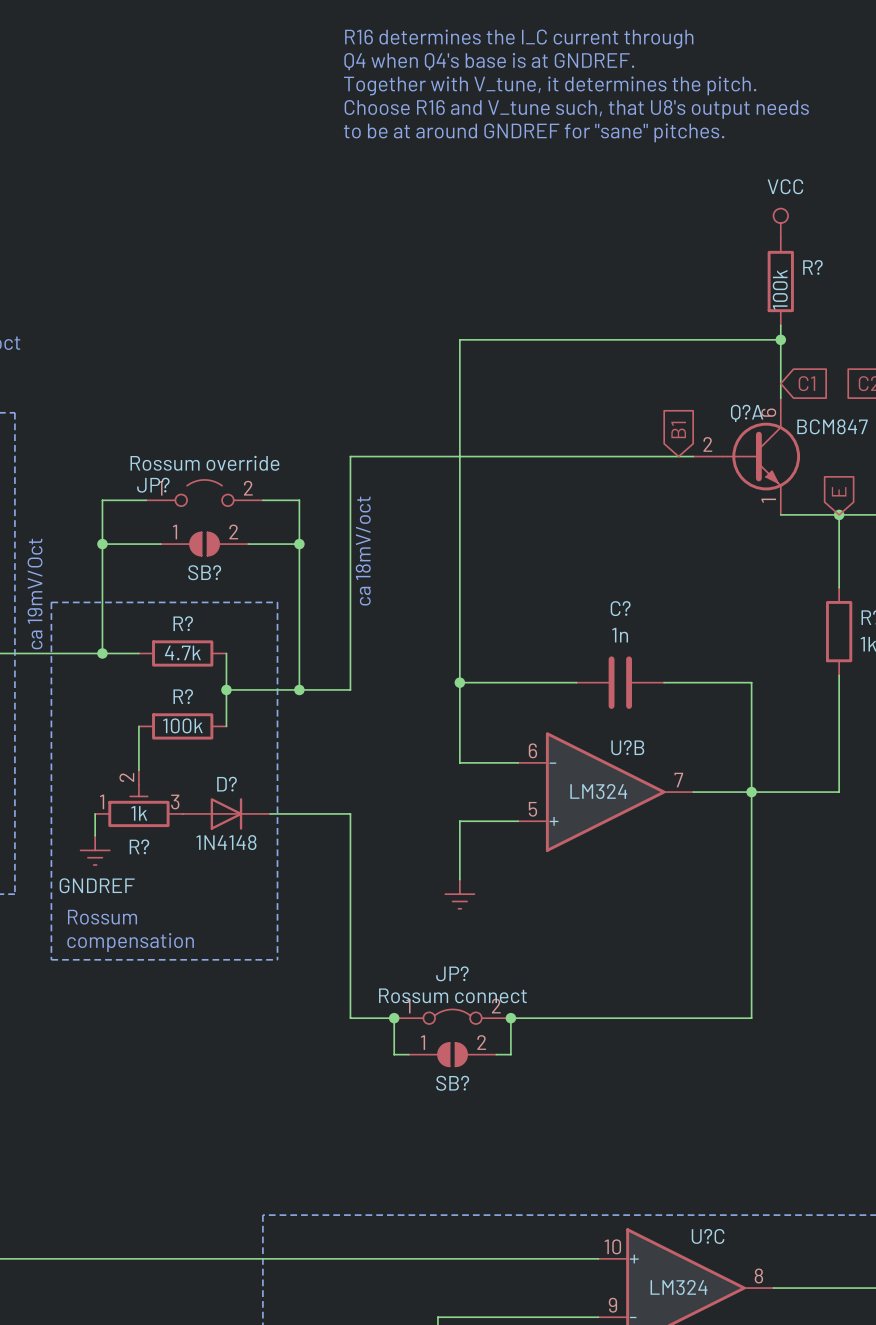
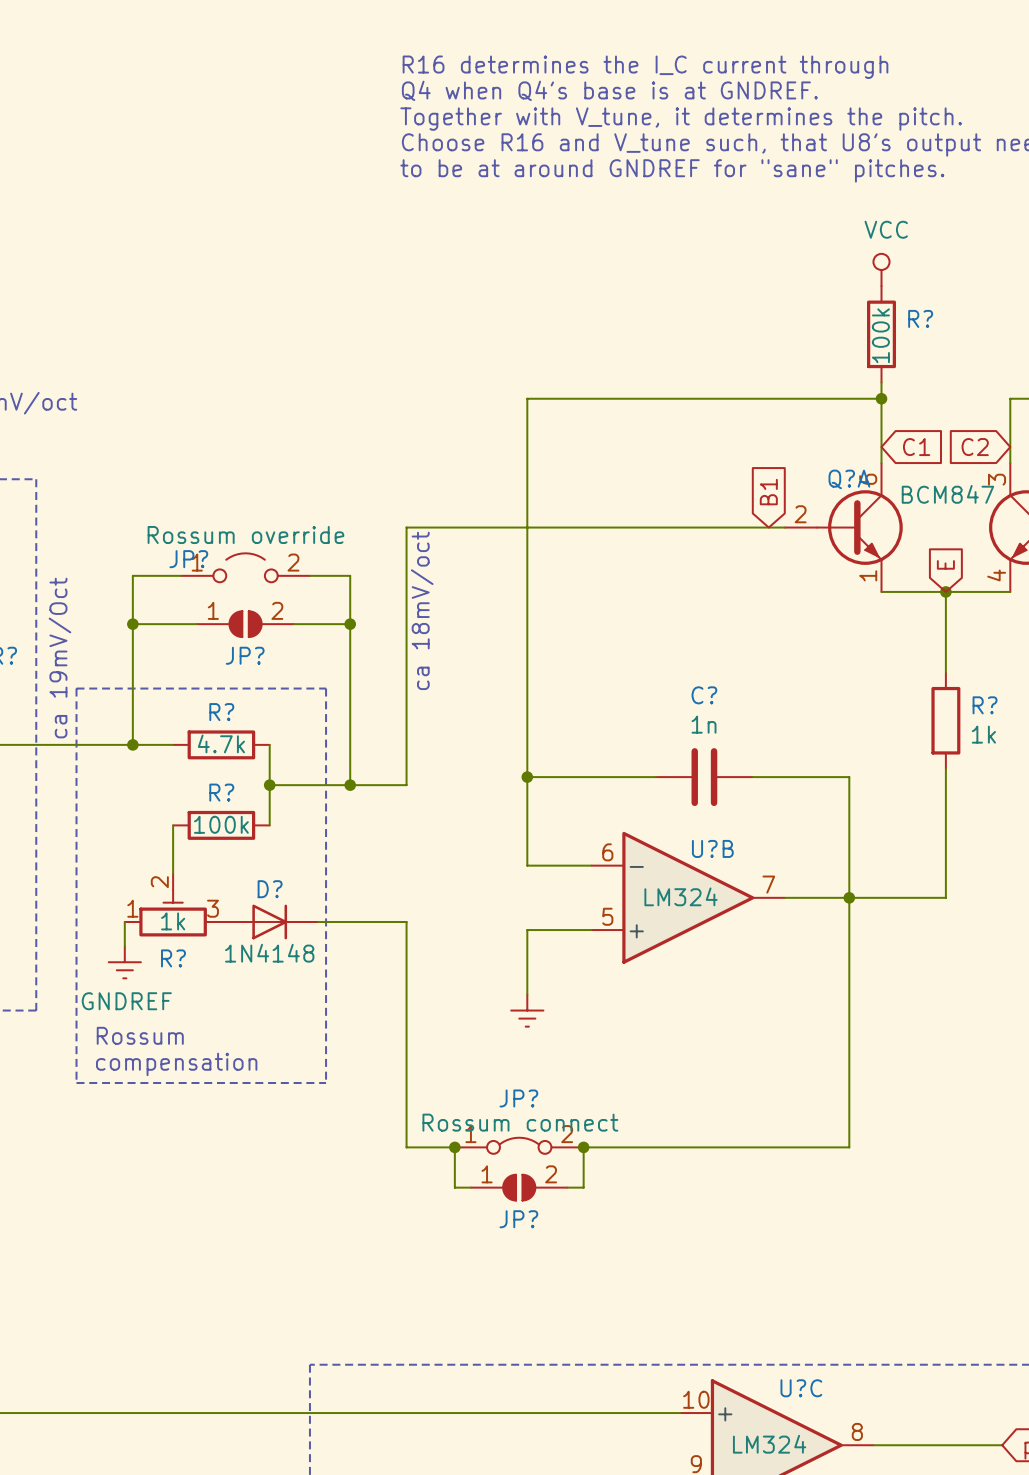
SB? name: SB? (204, 572) -> JP? (245, 655)
SB? name: SB? (452, 1083) -> JP? (518, 1219)

